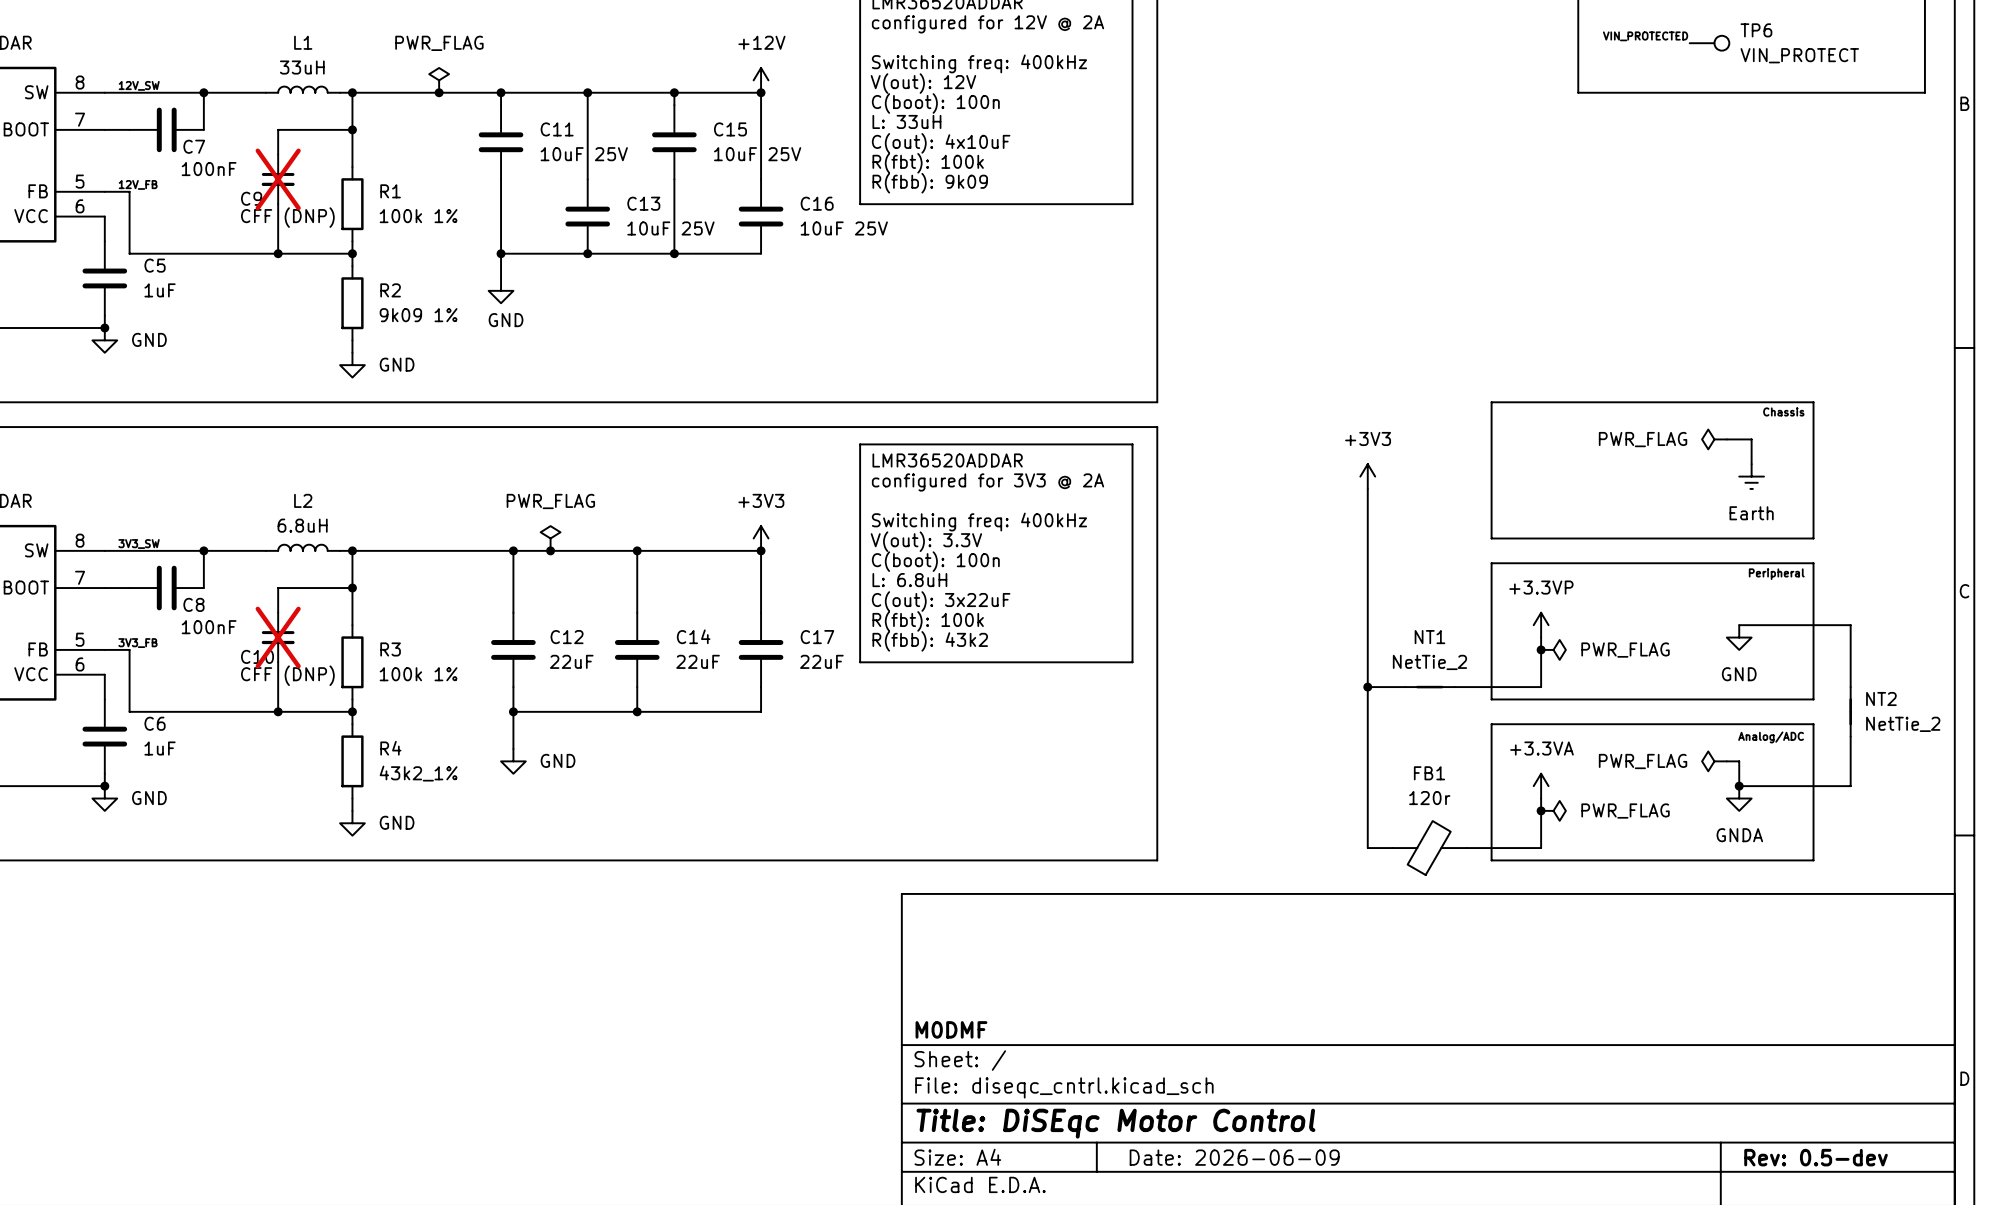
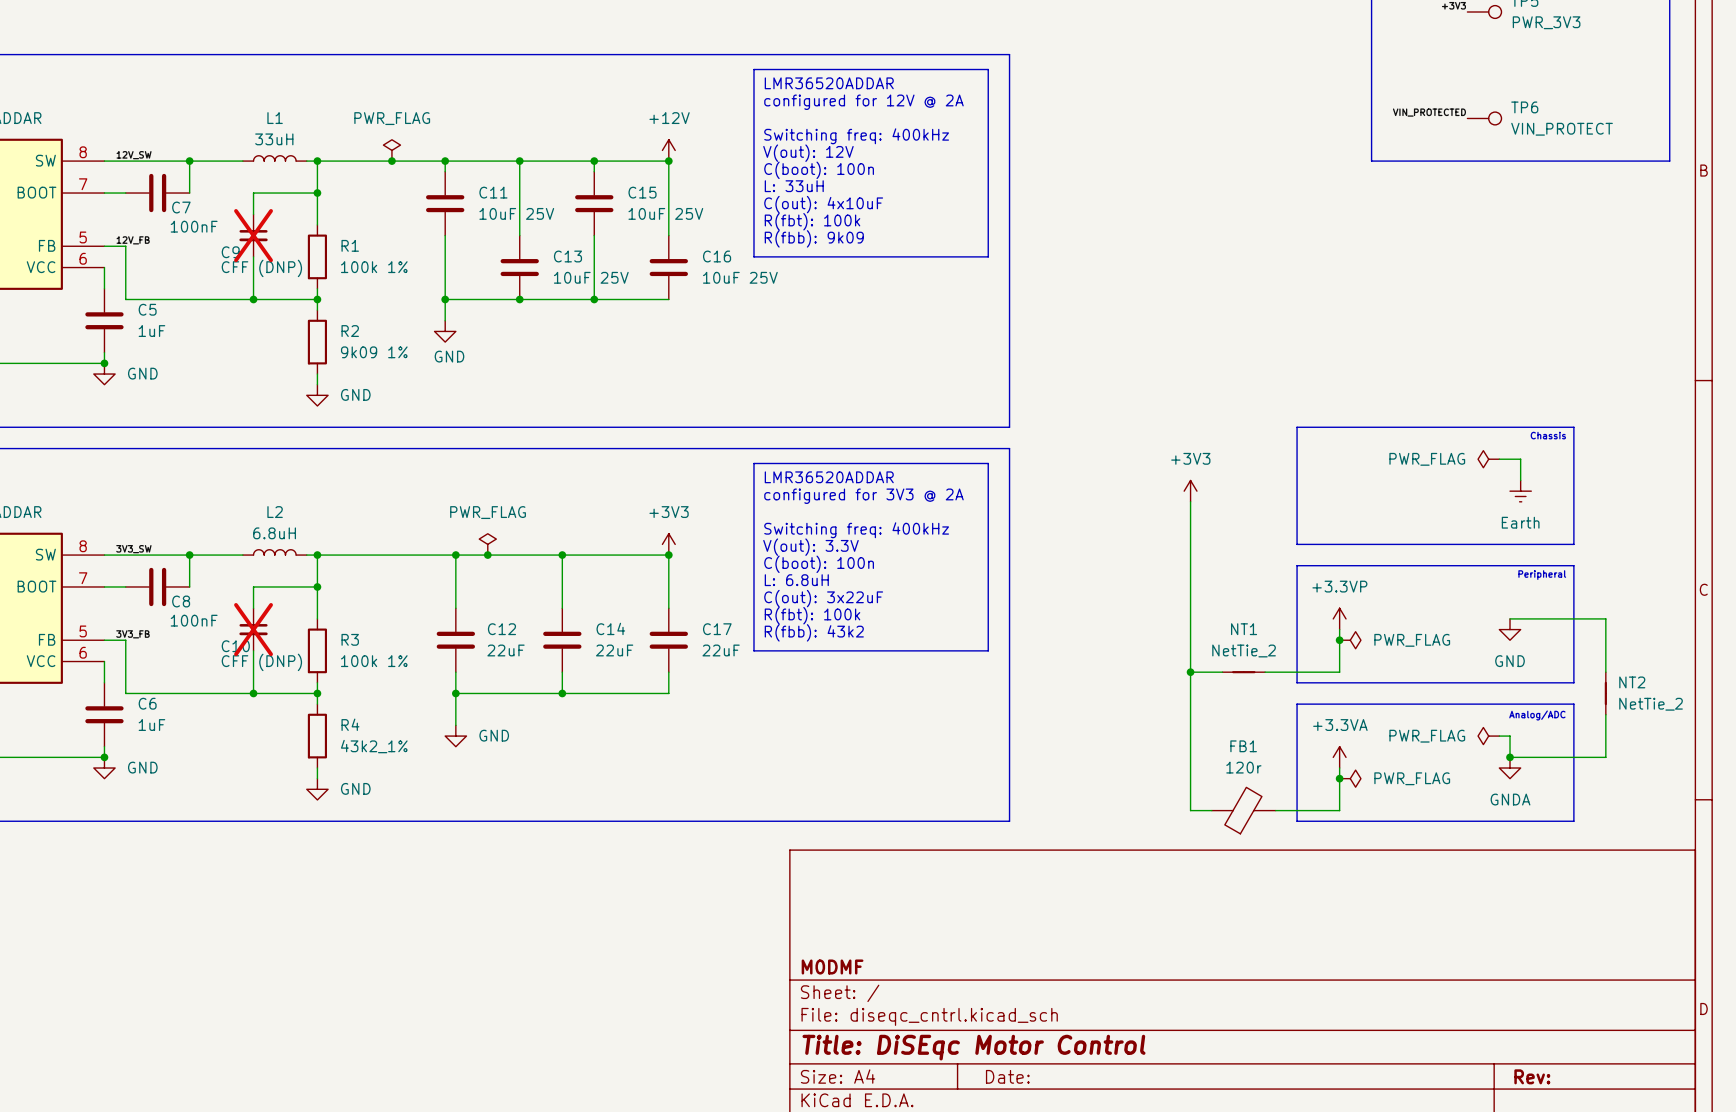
title block: Date: 2026-06-09 (1234, 1157) -> Date: (1007, 1076)
title block: Rev: 0.5-dev (1816, 1157) -> Rev: (1532, 1076)

